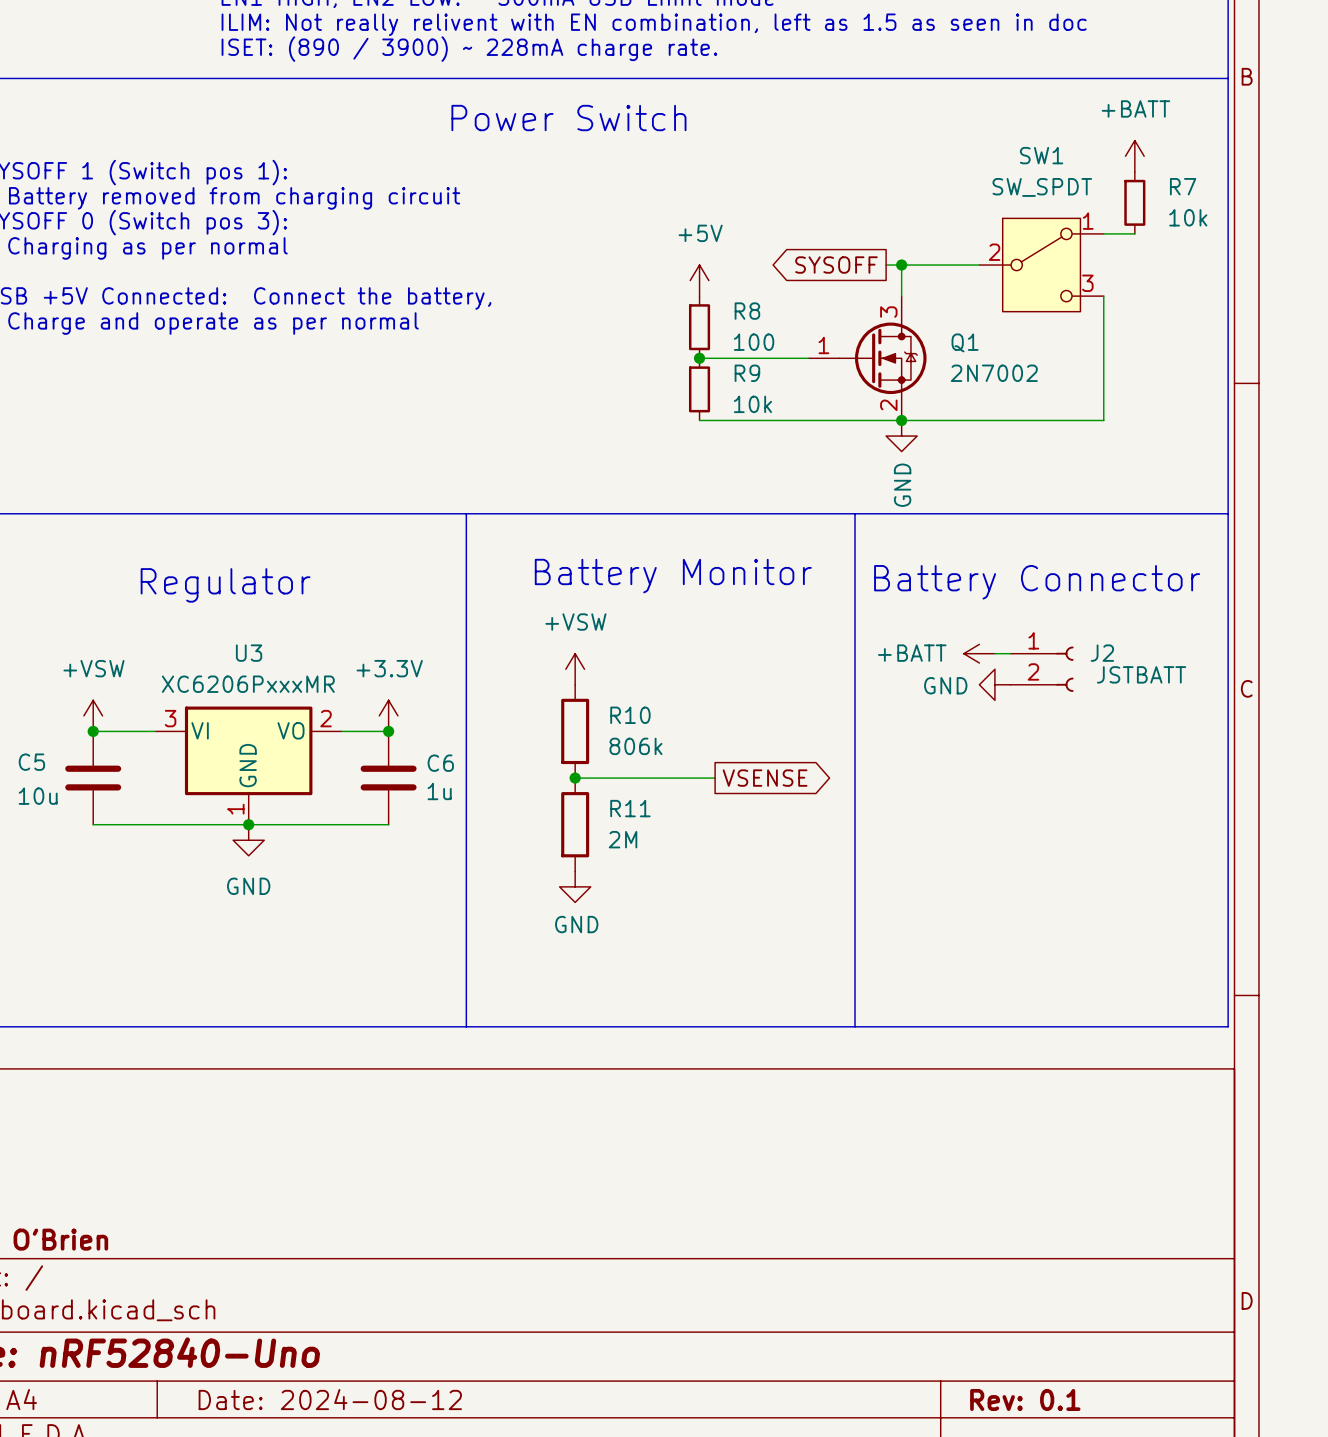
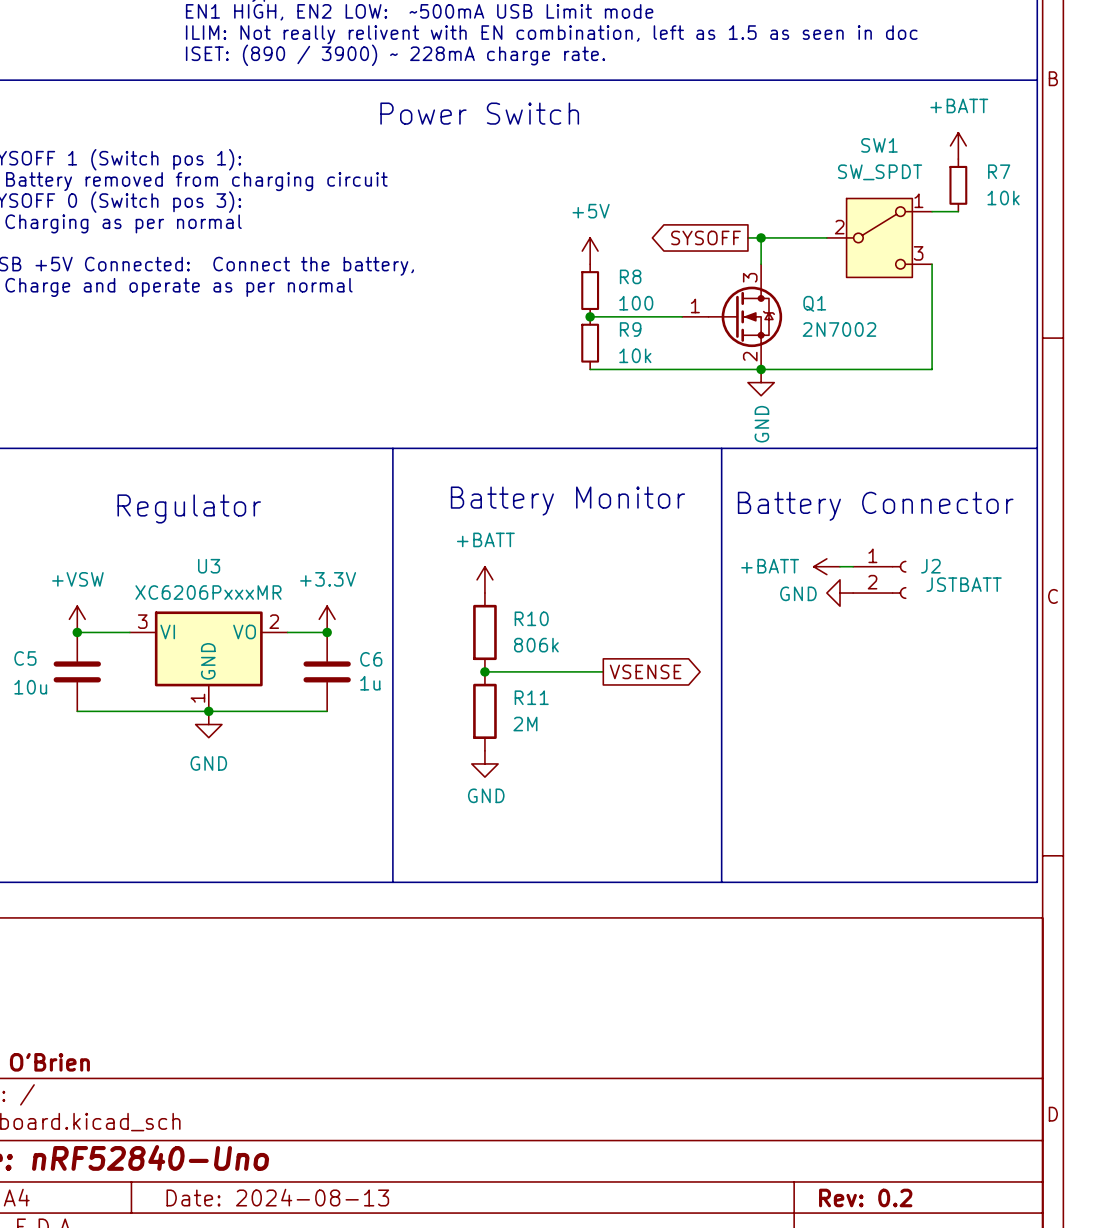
power symbol: +VSW (575, 669) -> +BATT (484, 579)
title block: Date: 2024-08-12 (330, 1399) -> Date: 2024-08-13 (277, 1197)
title block: Rev: 0.1 (1025, 1399) -> Rev: 0.2 (865, 1197)

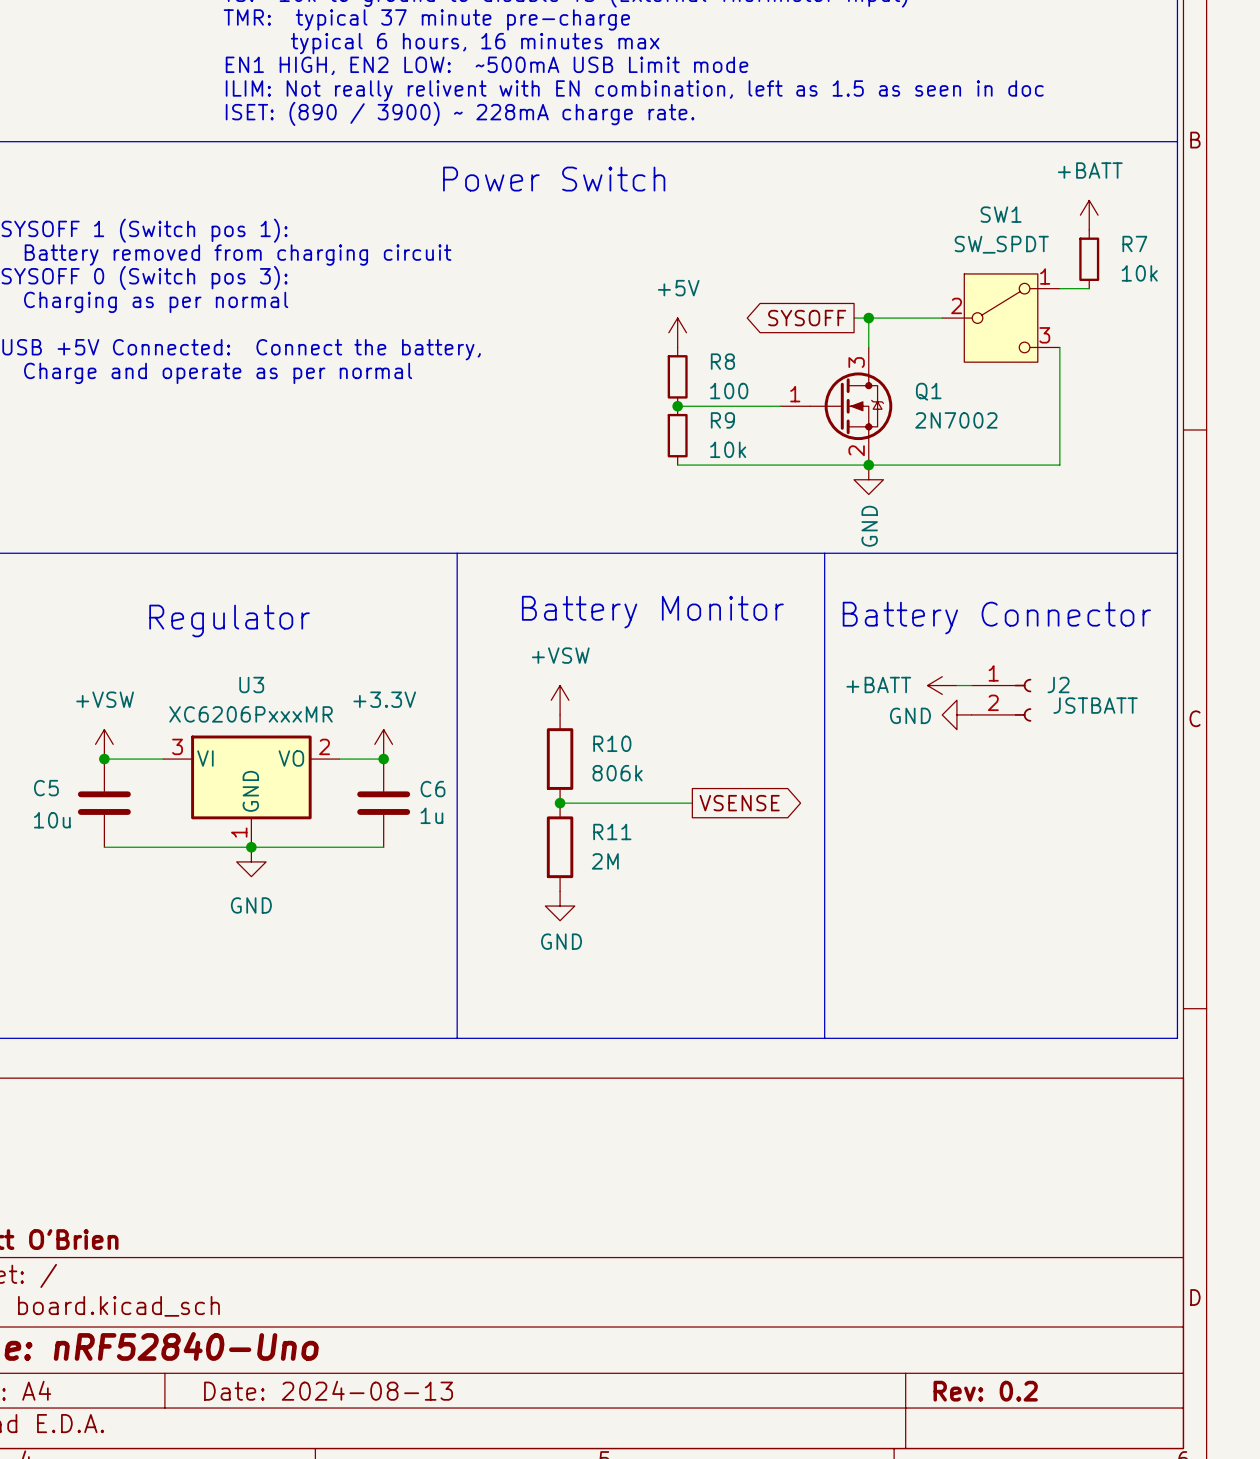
power symbol: +BATT (484, 579) -> +VSW (560, 700)

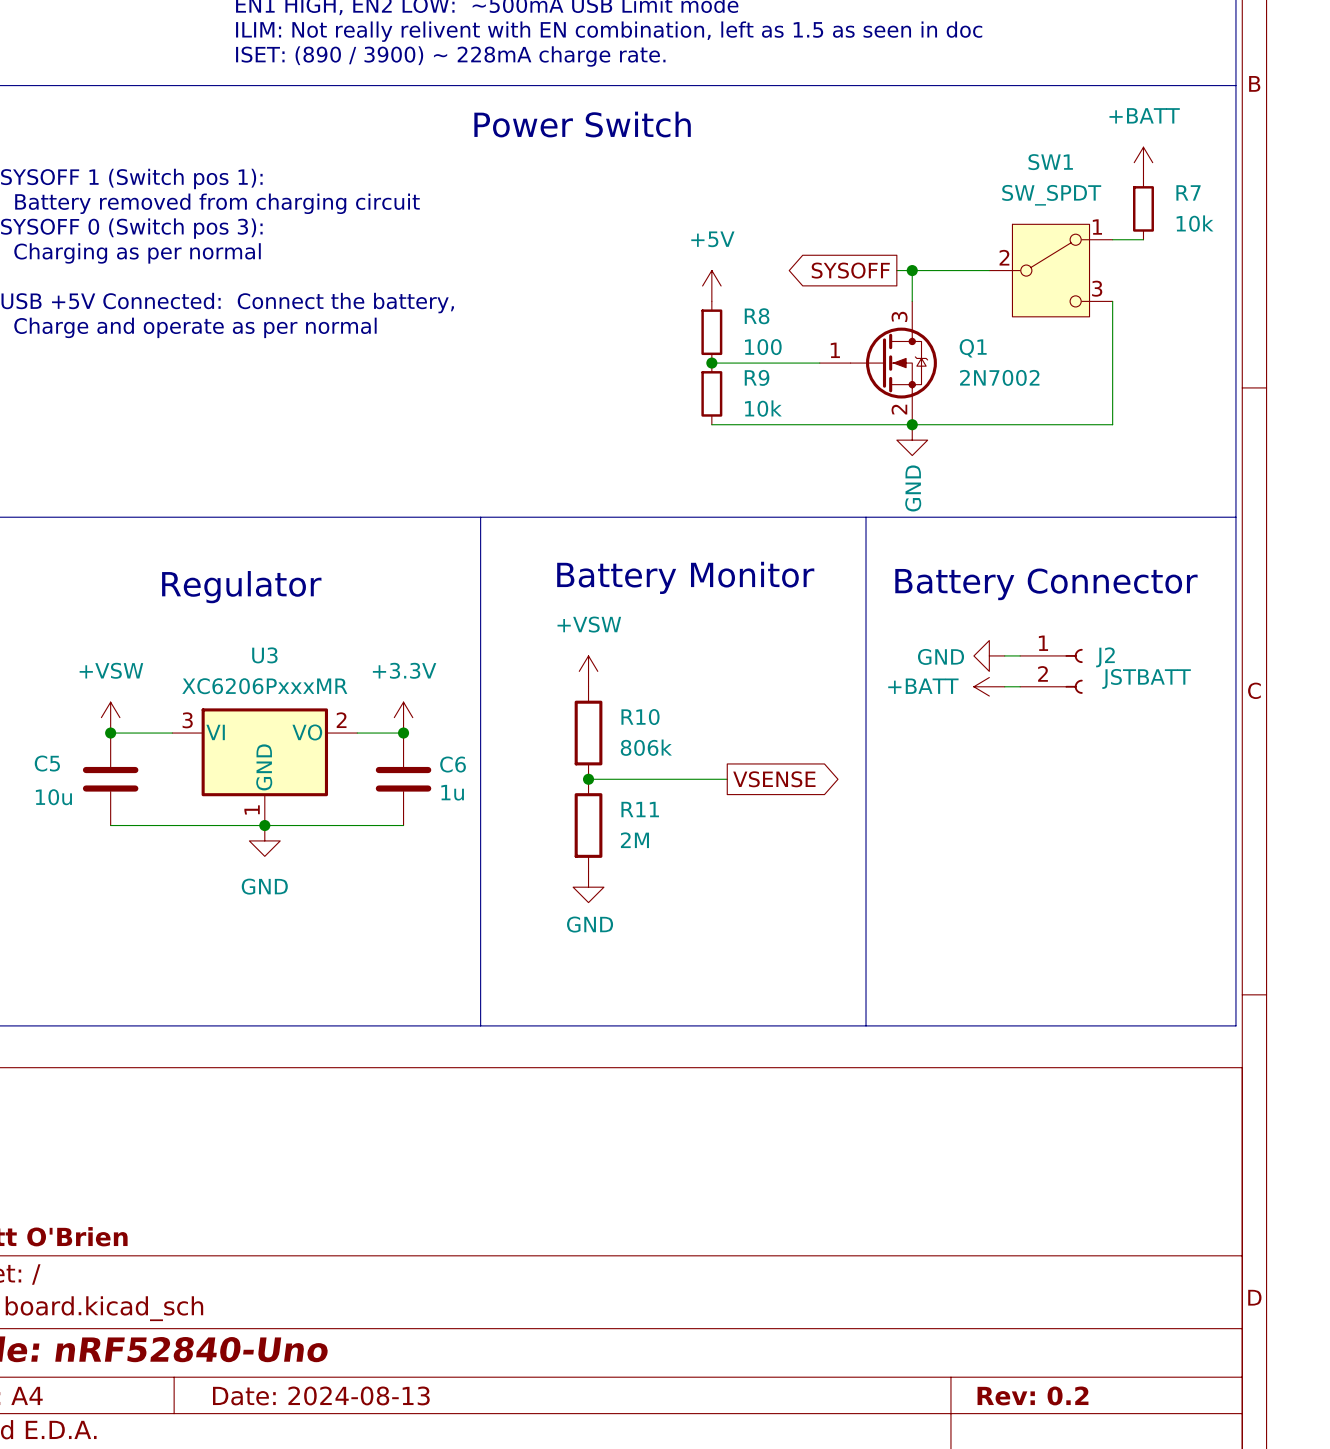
power symbol: +BATT (942, 685) -> GND (989, 655)
power symbol: none -> +BATT (989, 686)
power symbol: GND (956, 714) -> none

